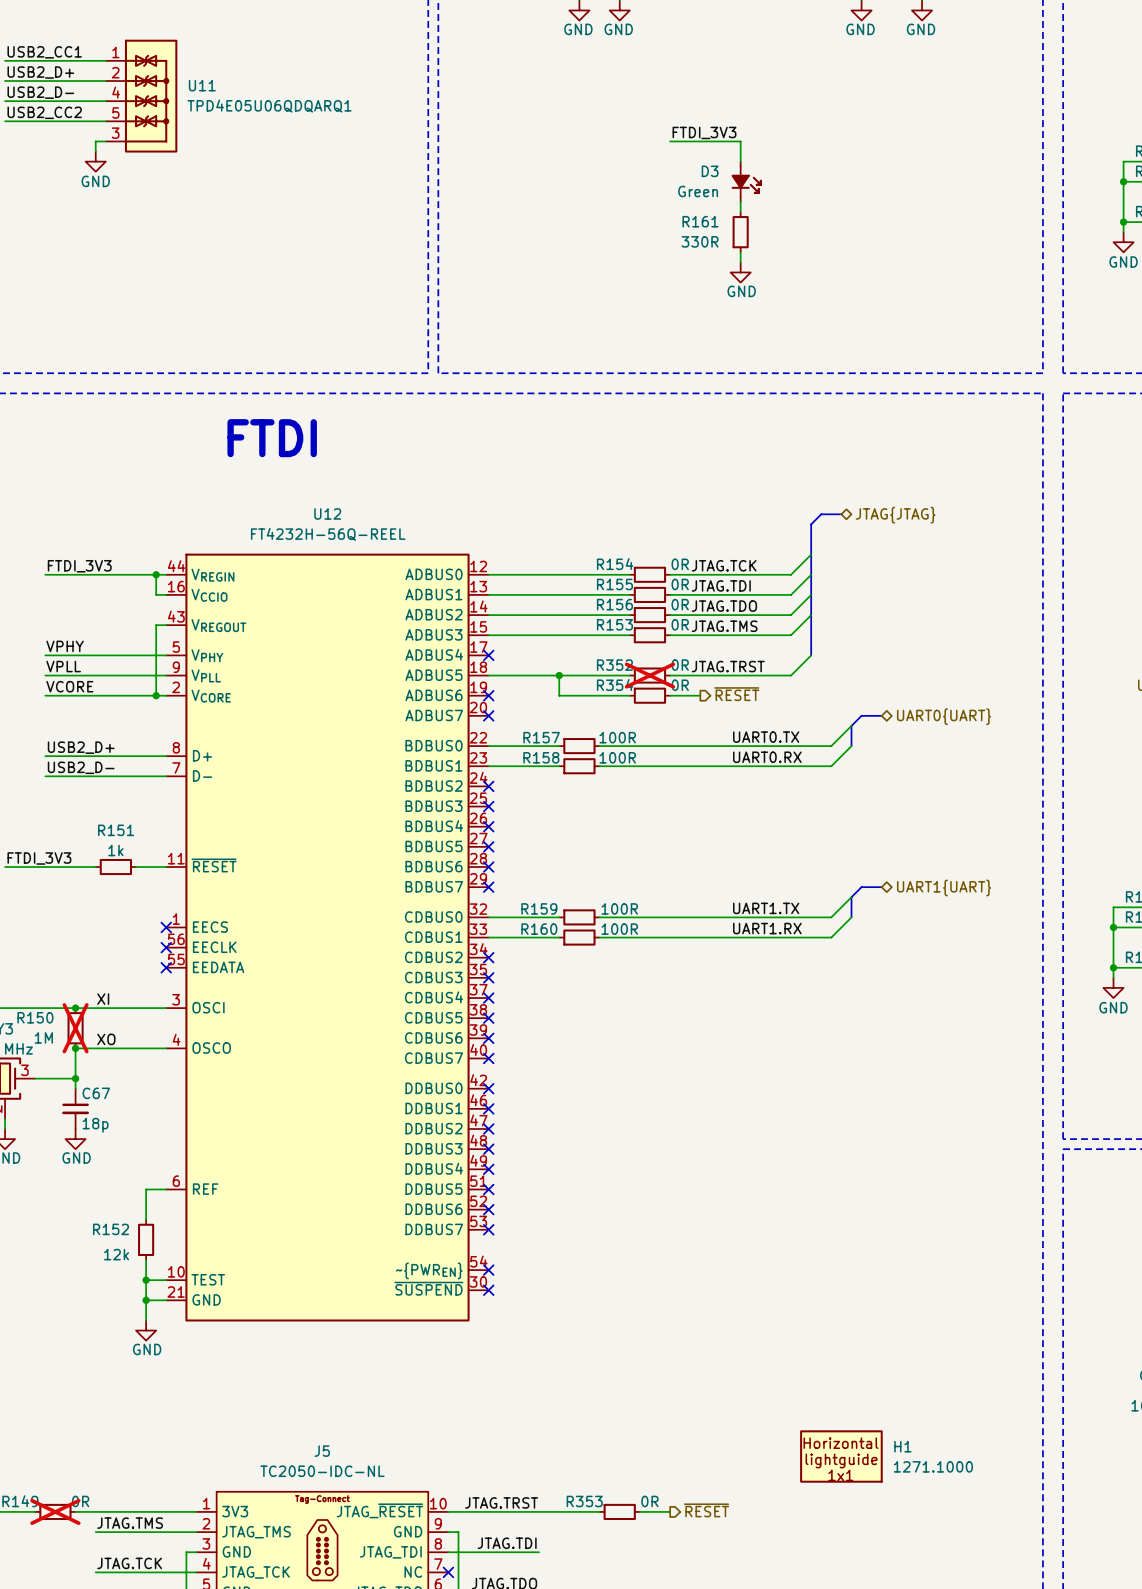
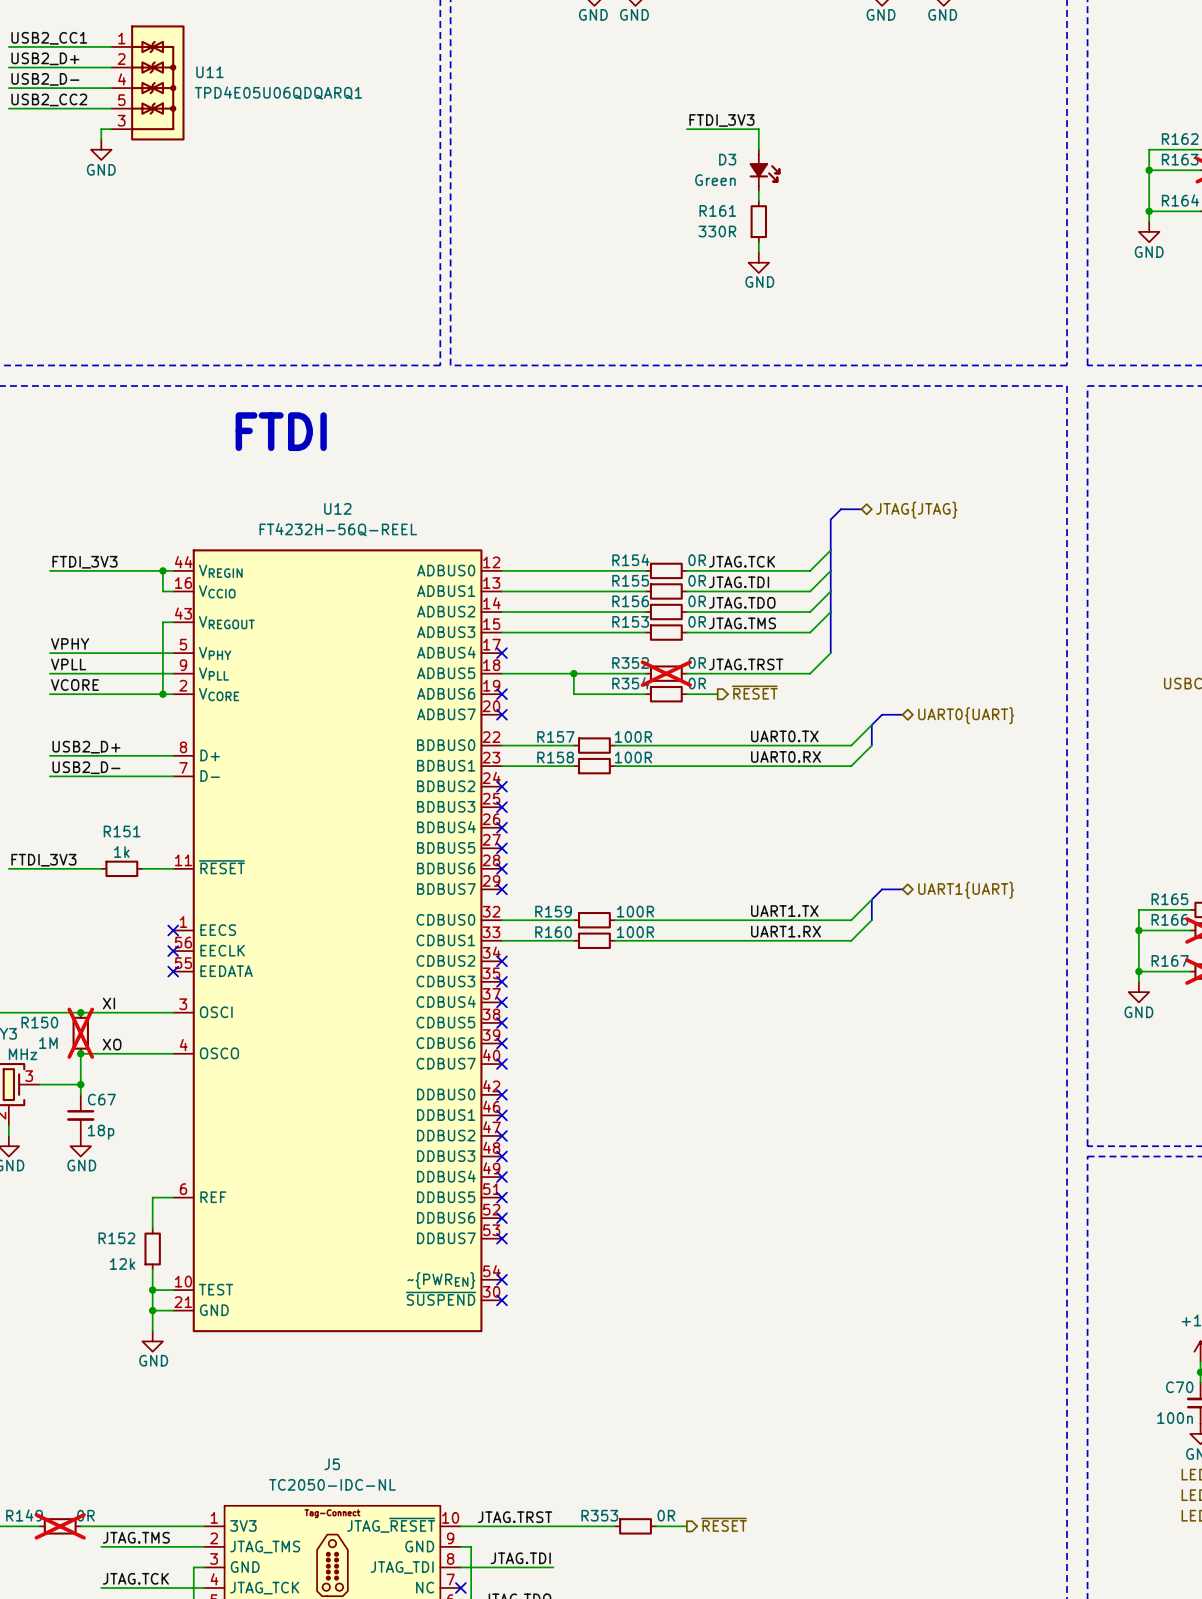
H1: (841, 1456) -> none

